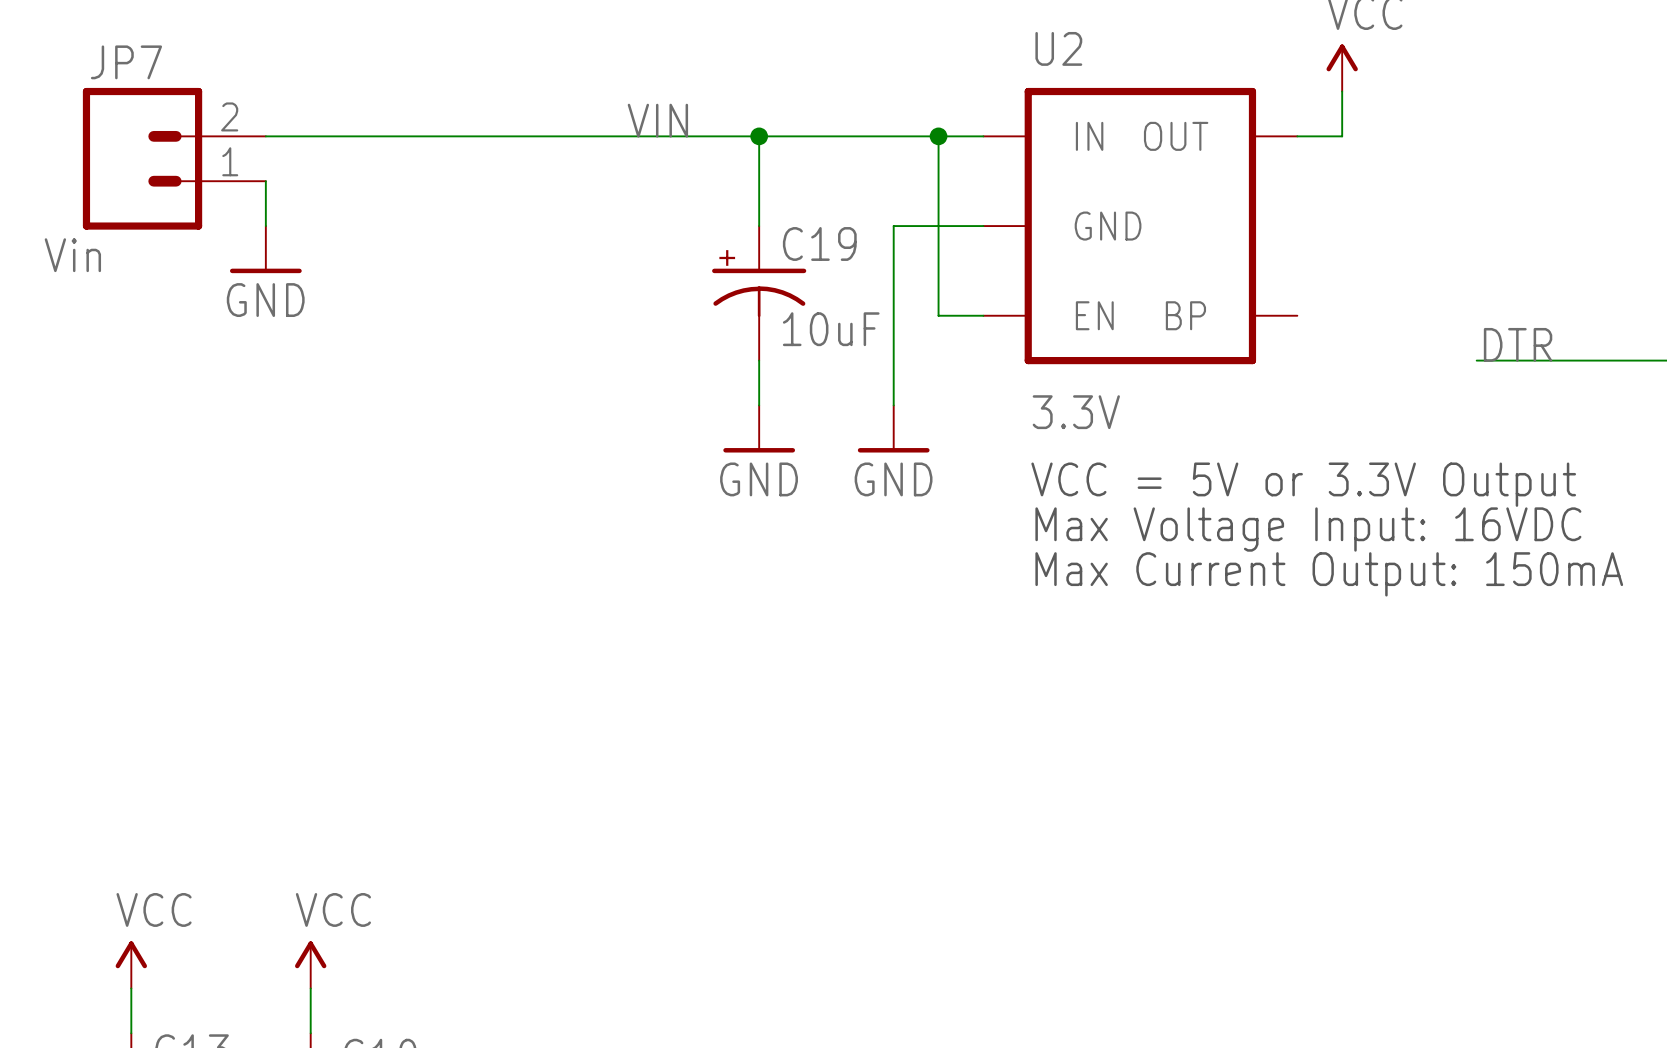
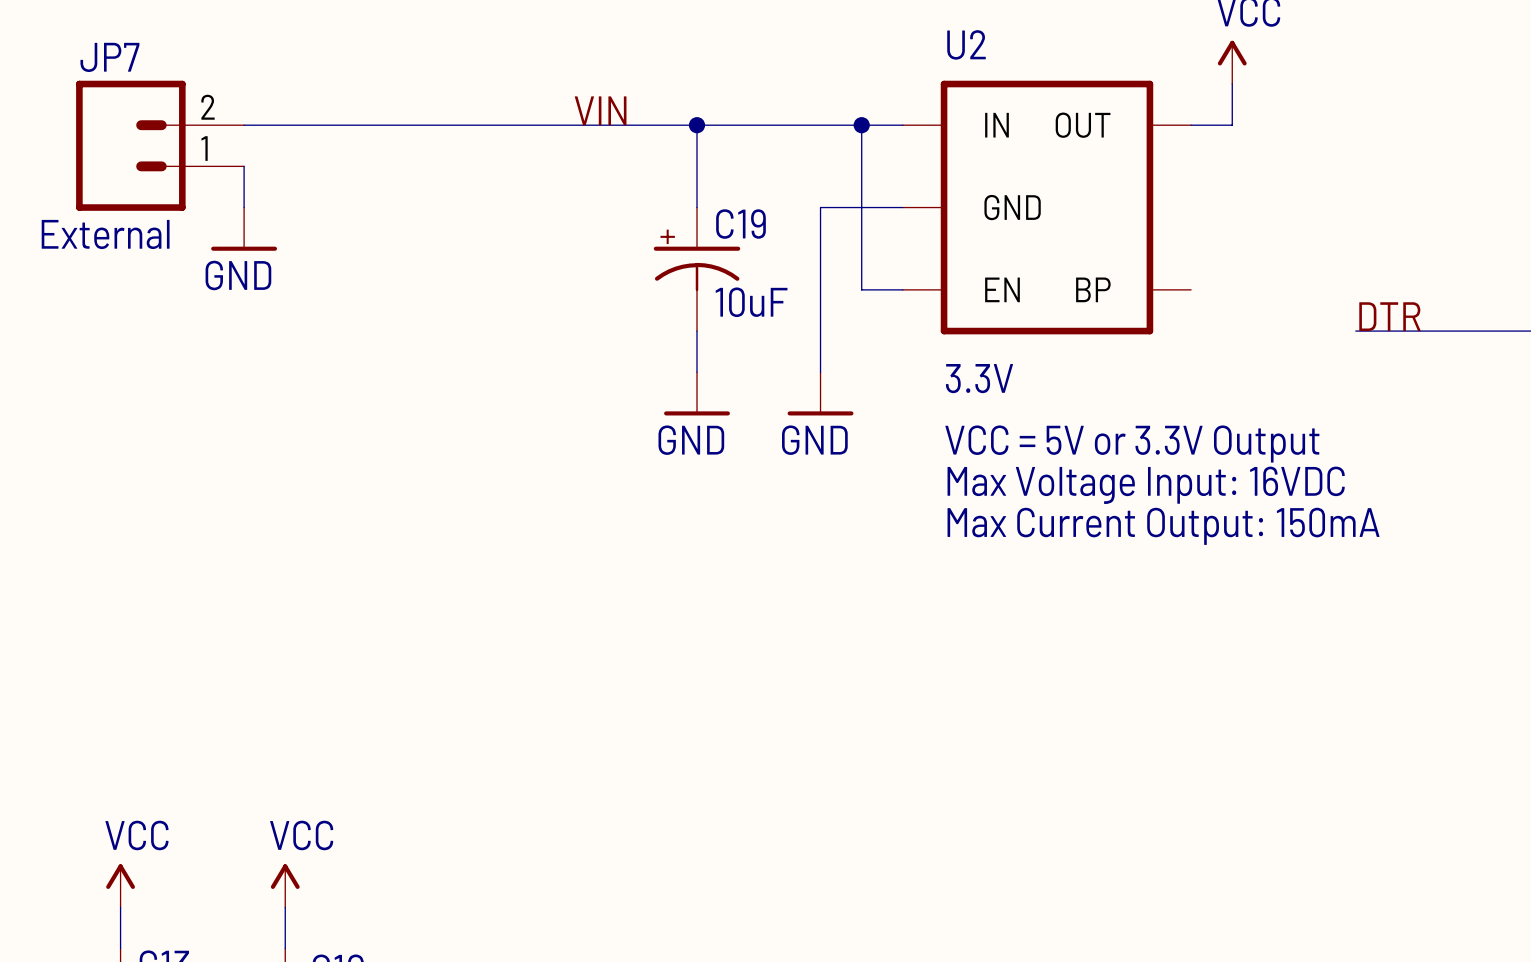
JP7 value: Vin (72, 255) -> External (105, 234)

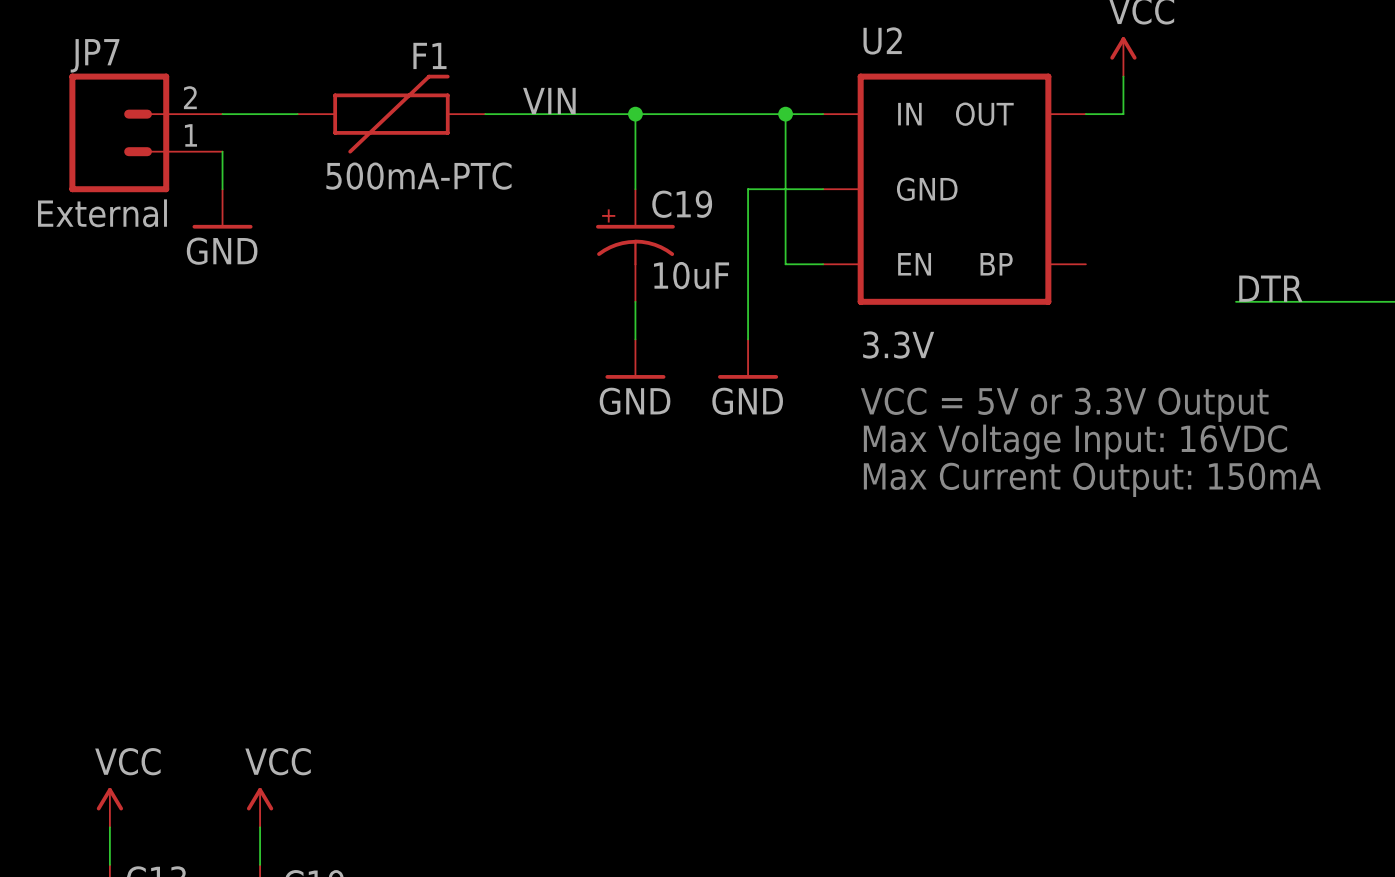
wire: (326, 125) (532, 125) -> none
F1: none -> 500mA-PTC (391, 114)

